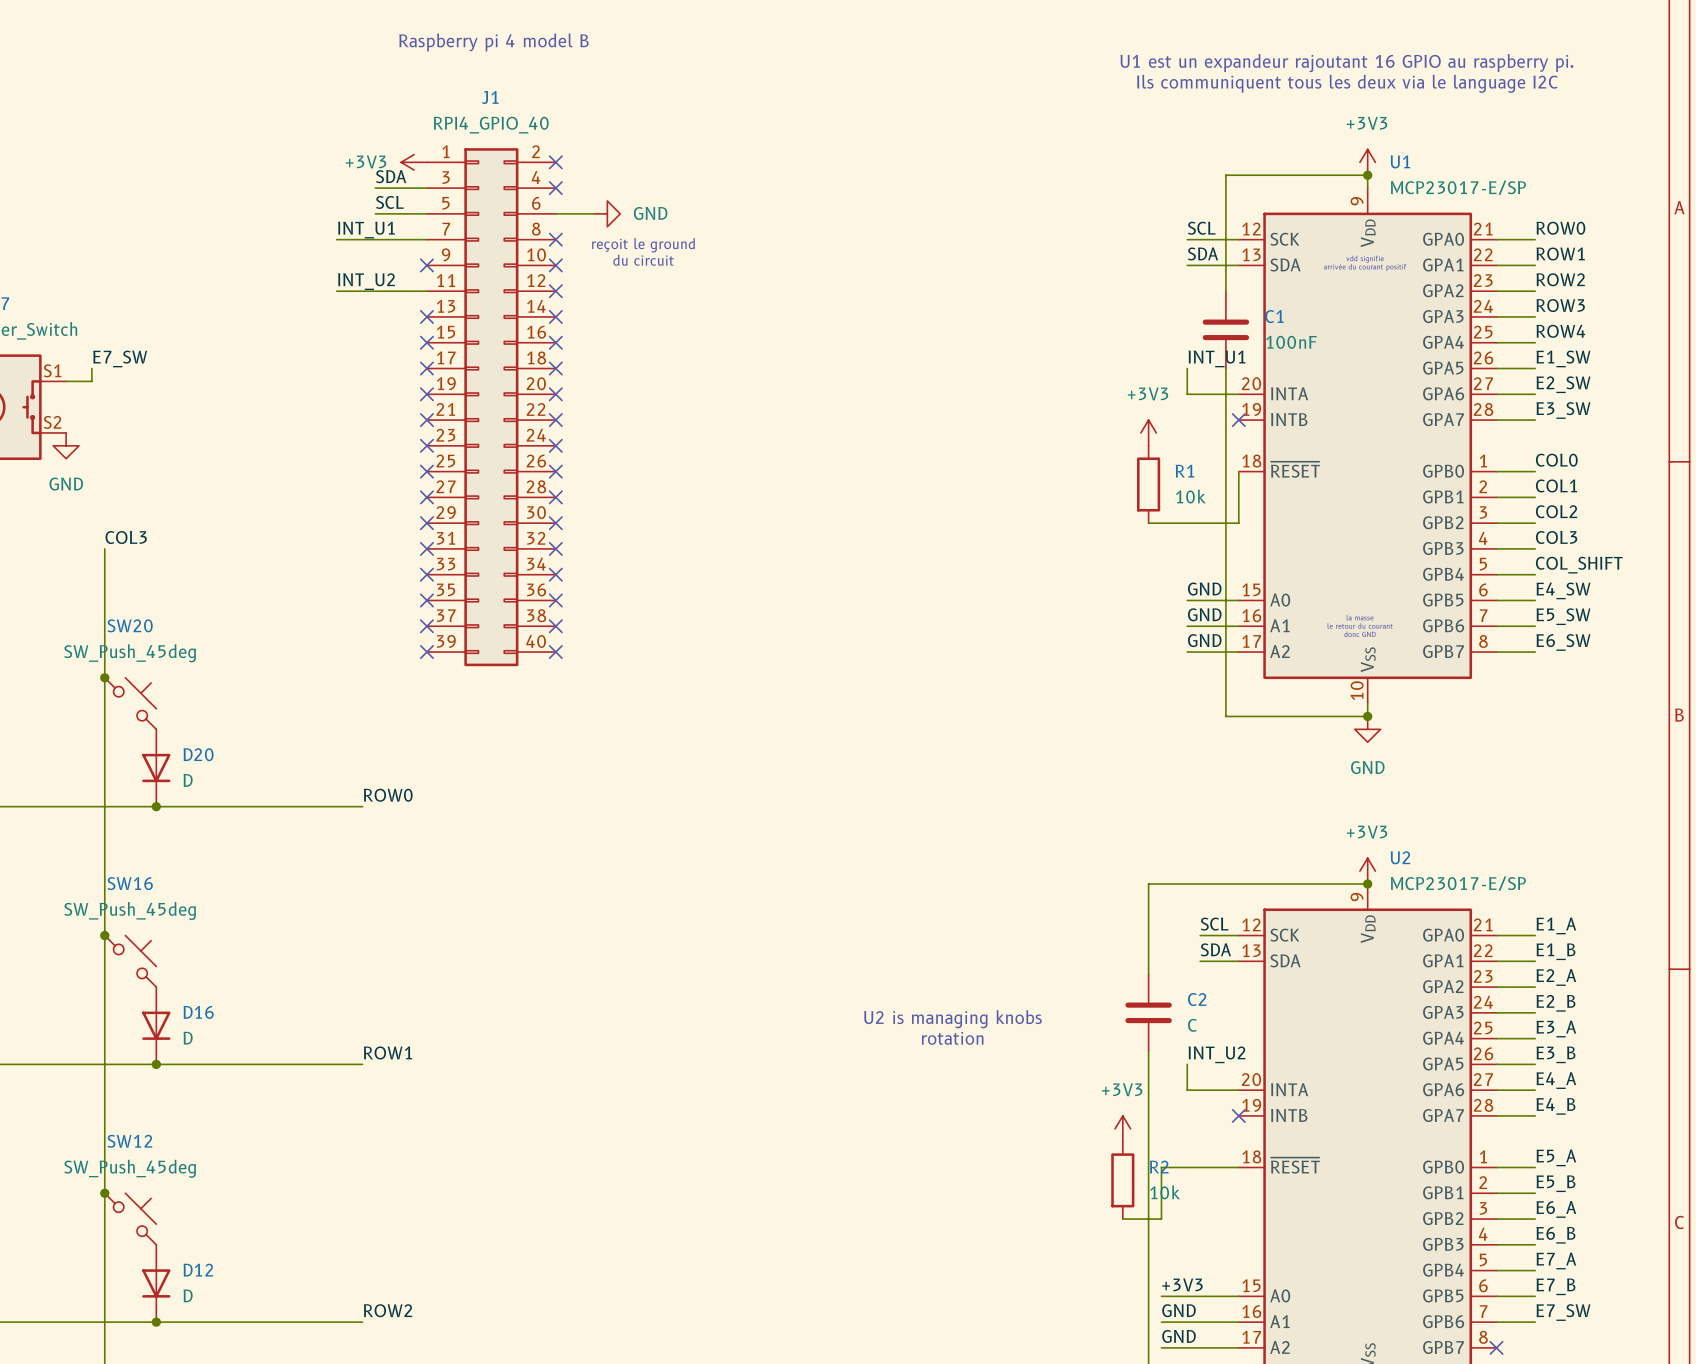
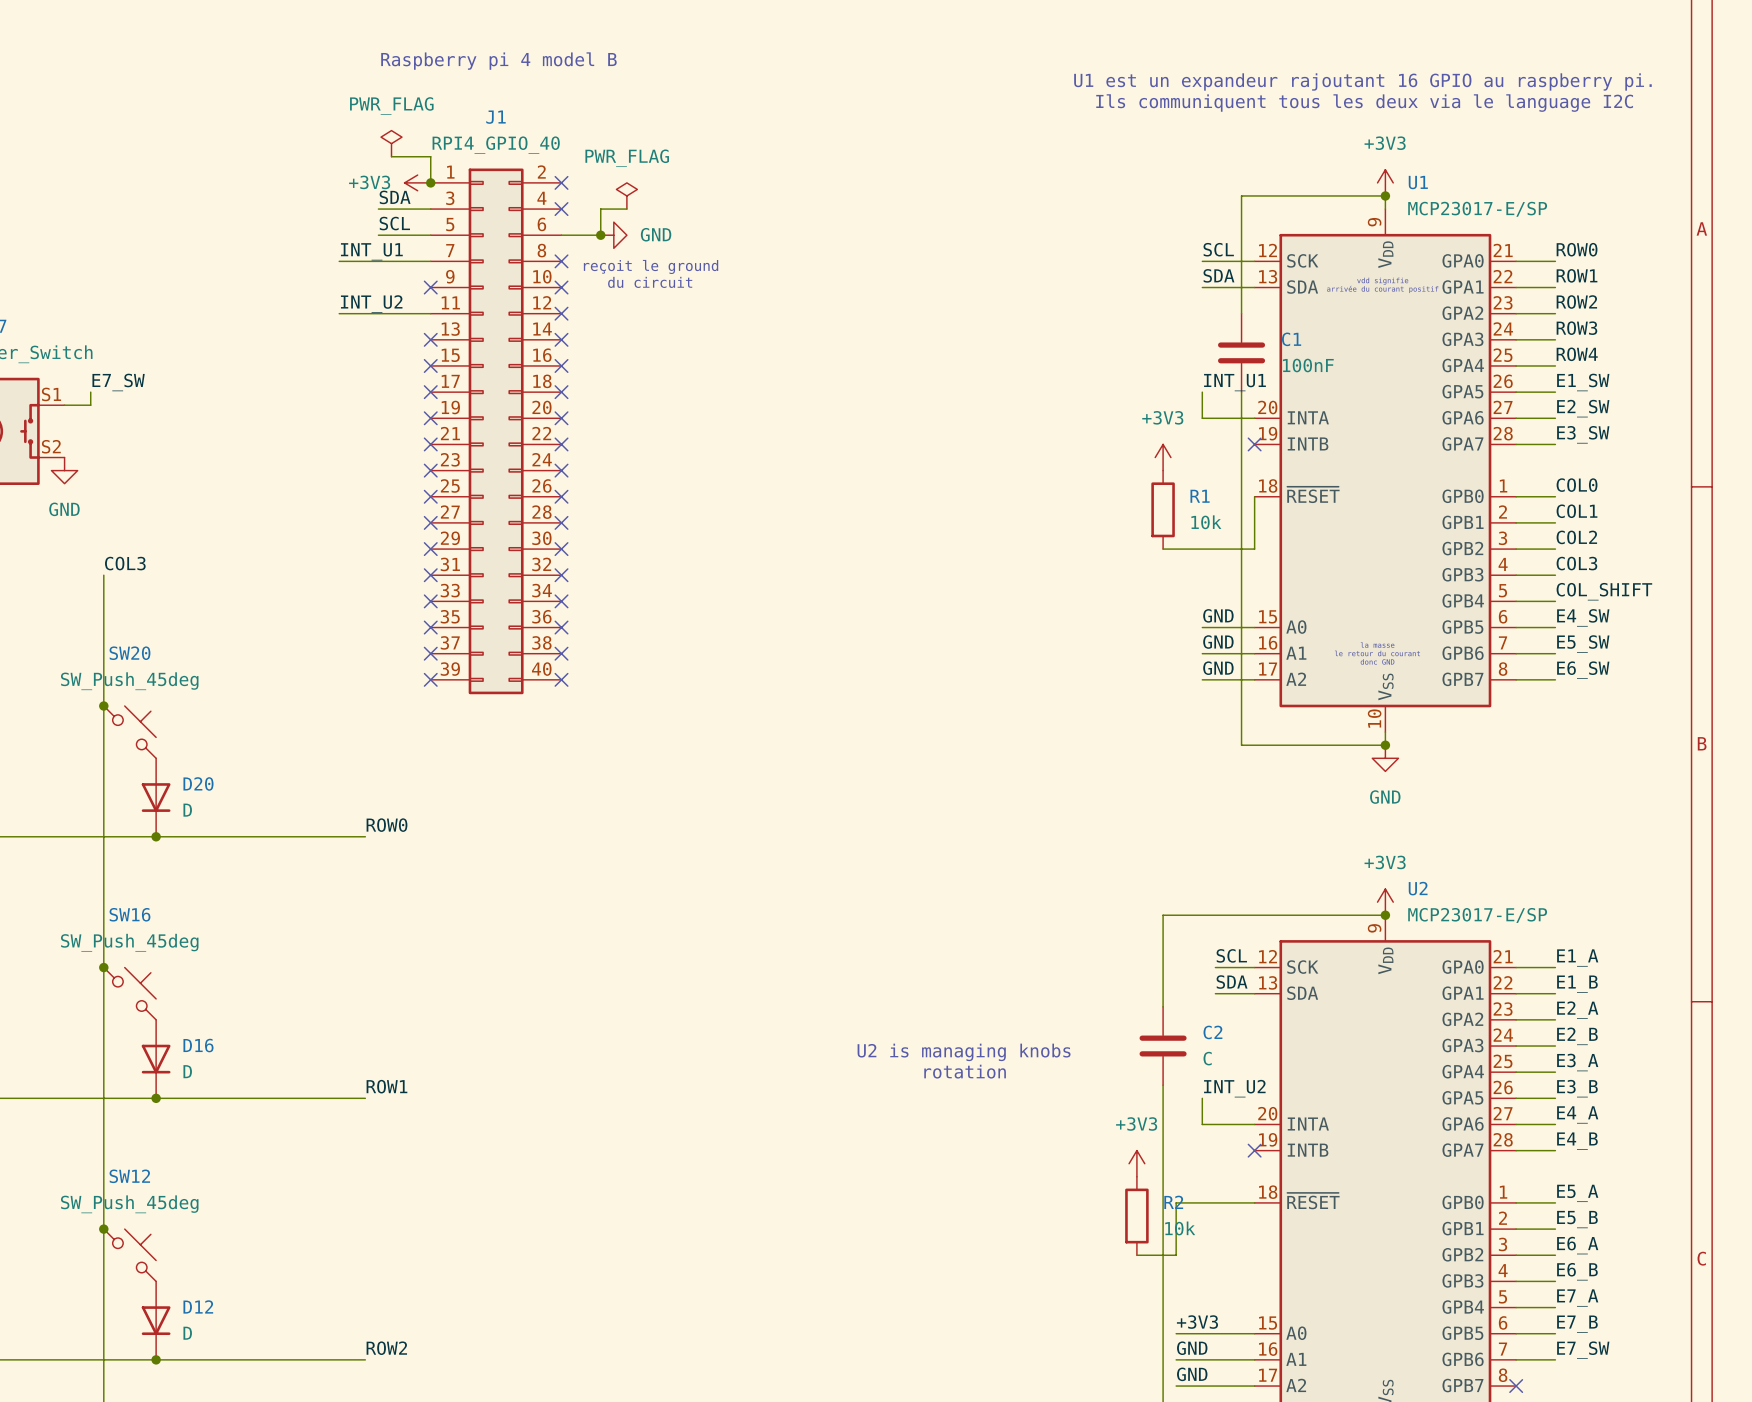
power symbol: none -> PWR_FLAG (391, 143)
wire: none -> (391, 156) (430, 156) (430, 182)
junction: none -> (430, 182)
power symbol: none -> PWR_FLAG (626, 195)
wire: none -> (626, 209) (600, 209) (600, 235)
junction: none -> (600, 235)

